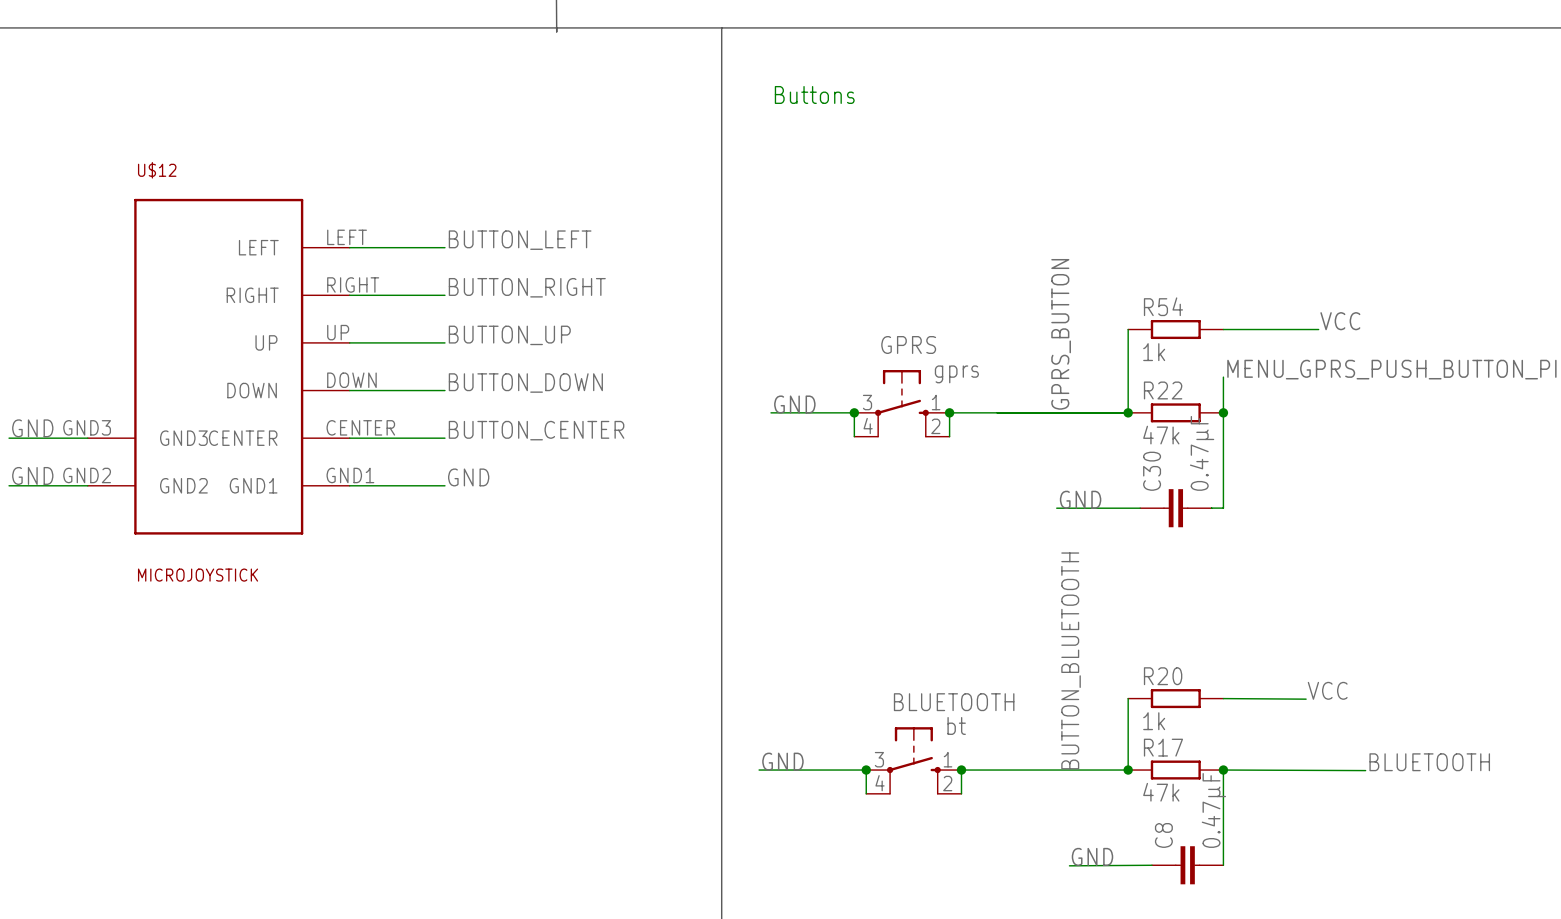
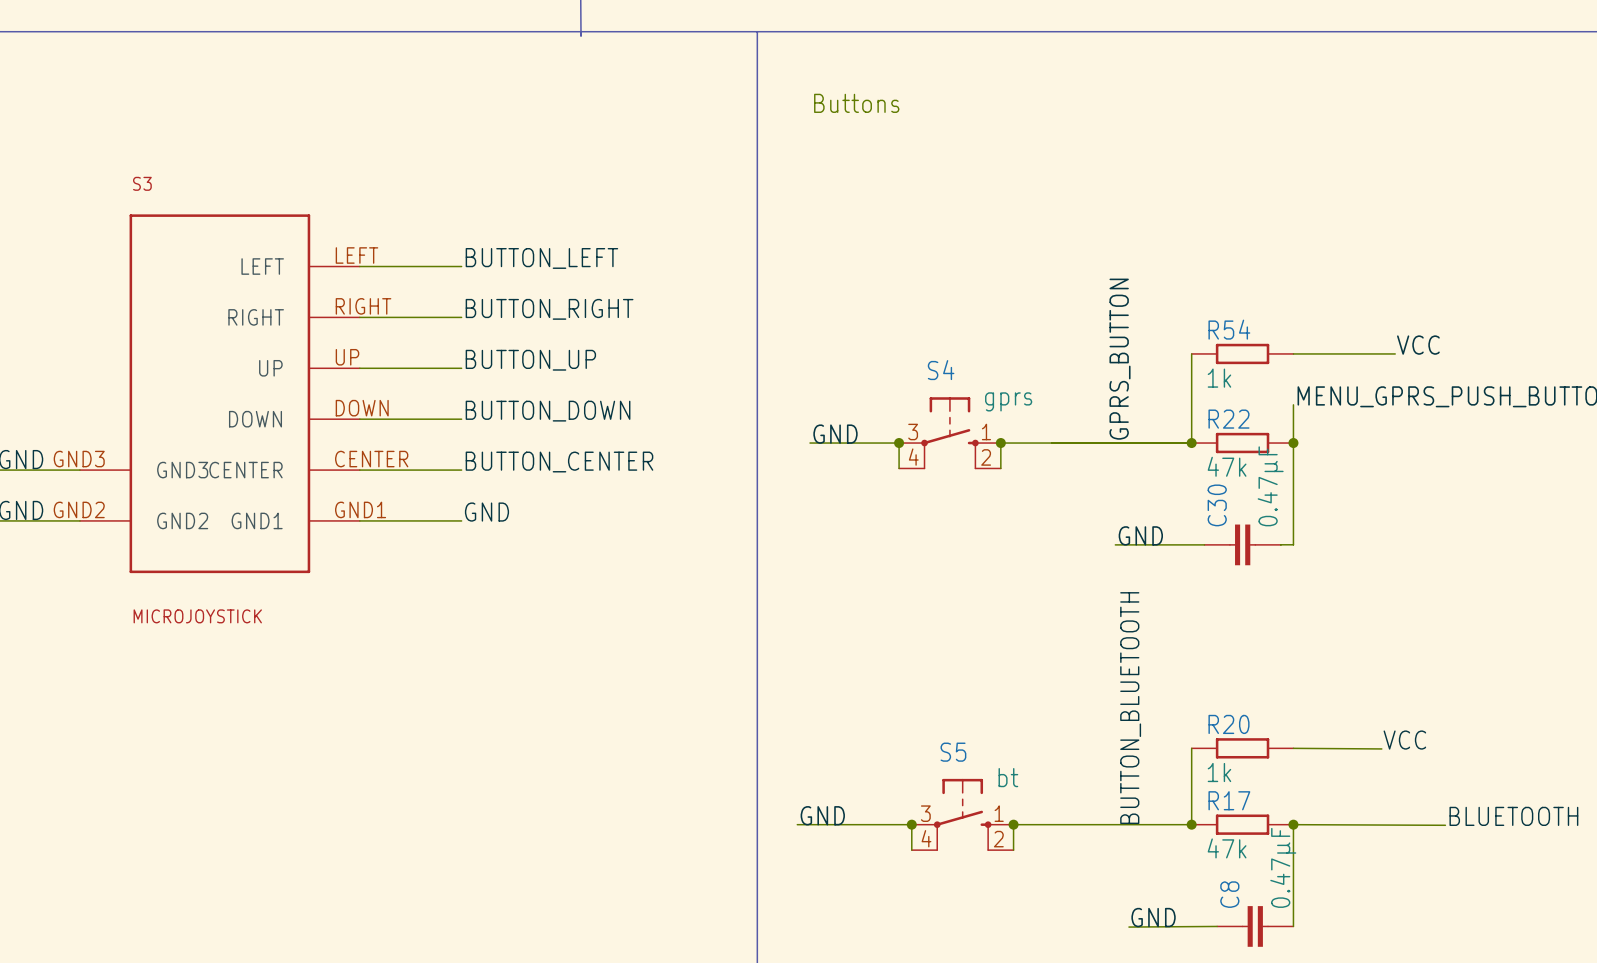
U$12 name: U$12 (157, 170) -> S3 (142, 183)
GPRS name: GPRS (908, 344) -> S4 (941, 370)
BLUETOOTH name: BLUETOOTH (954, 702) -> S5 (953, 752)

